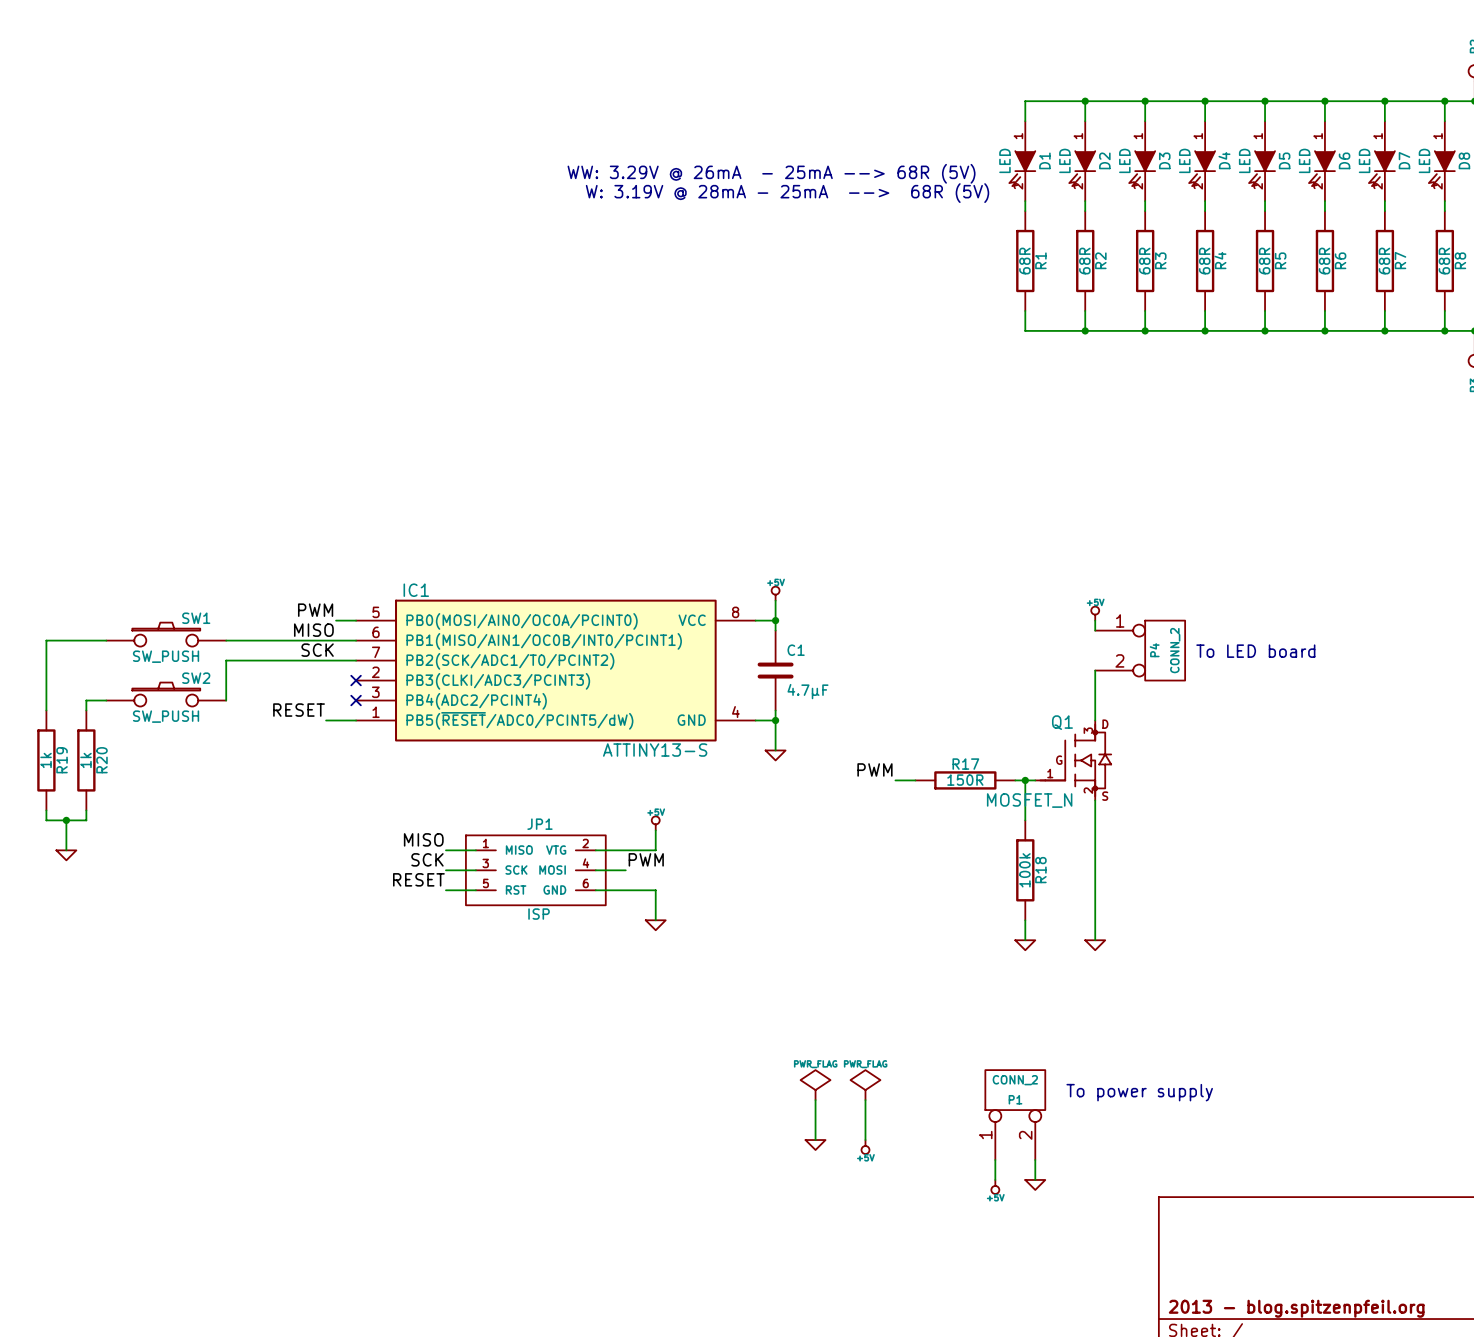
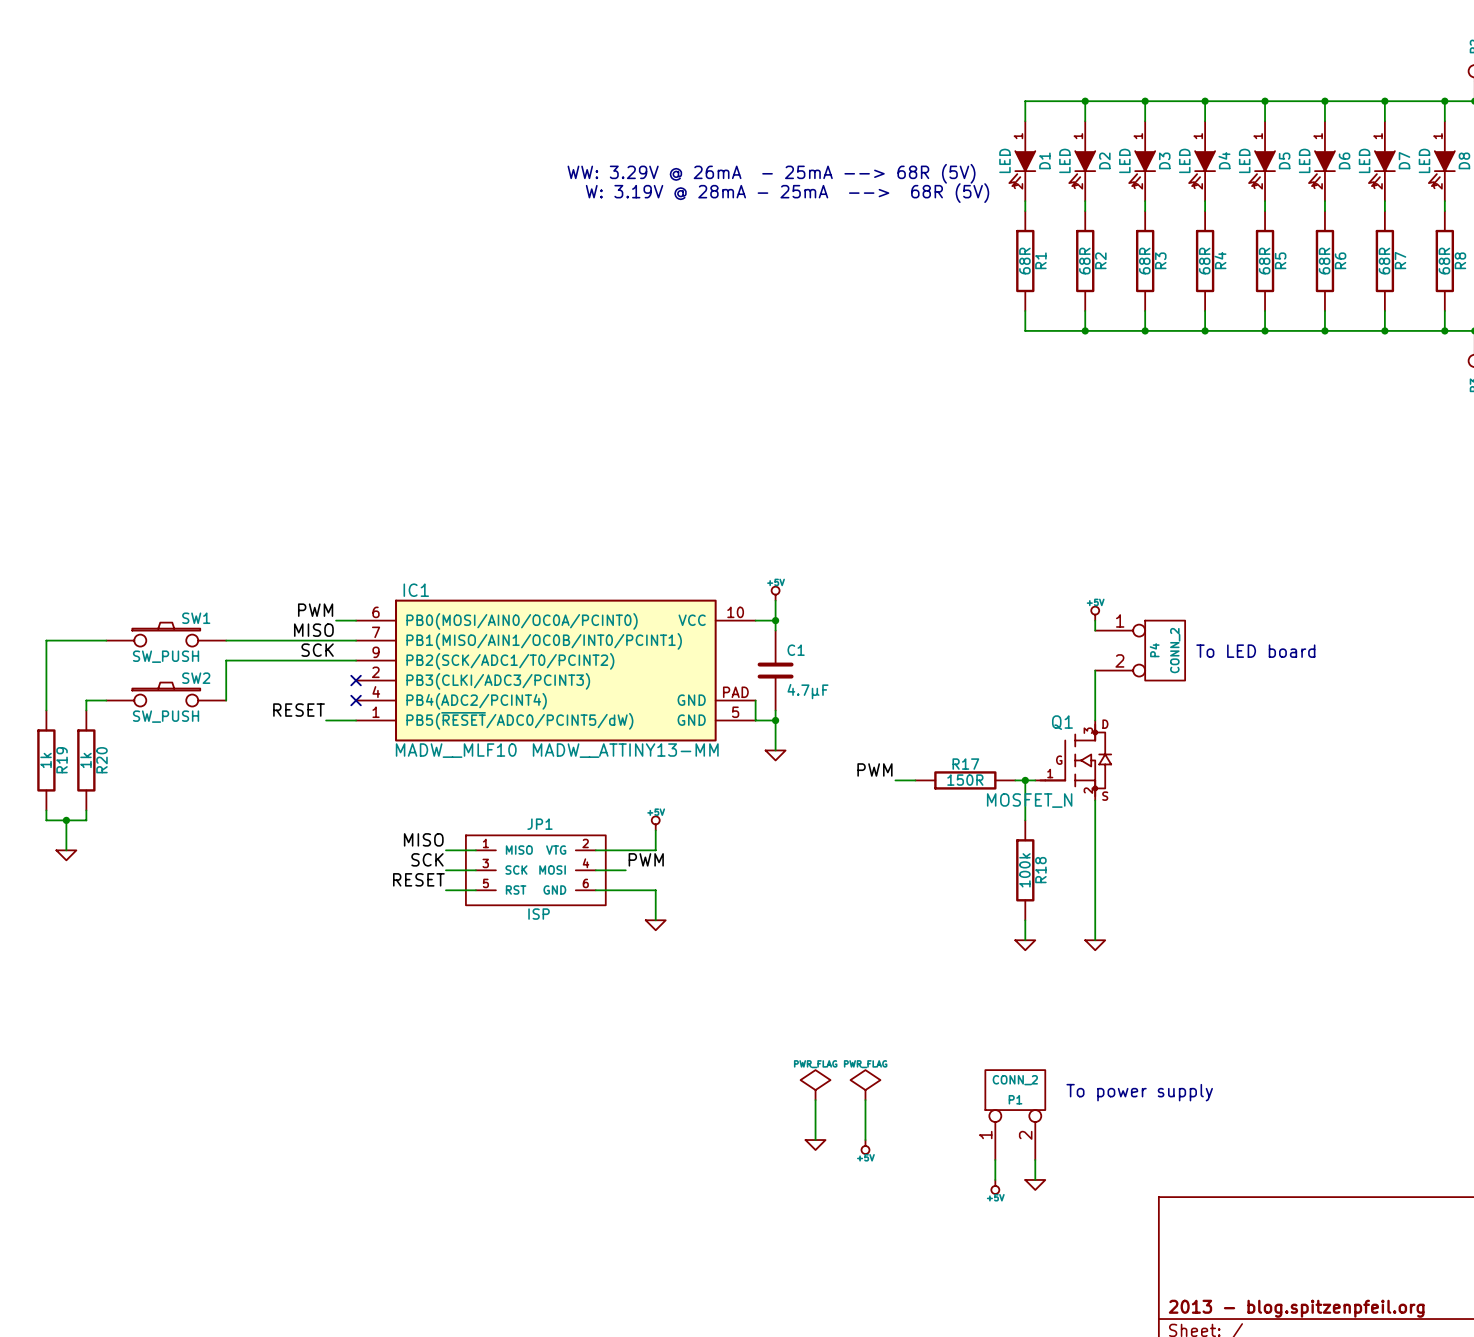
IC1 symbol: [356, 599, 756, 742] -> [356, 599, 756, 742]
wire: none -> (755, 700) (755, 720)
IC1 text: none -> MADW__MLF10 (456, 750)
IC1 value: ATTINY13-S (655, 750) -> MADW__ATTINY13-MM (625, 750)

